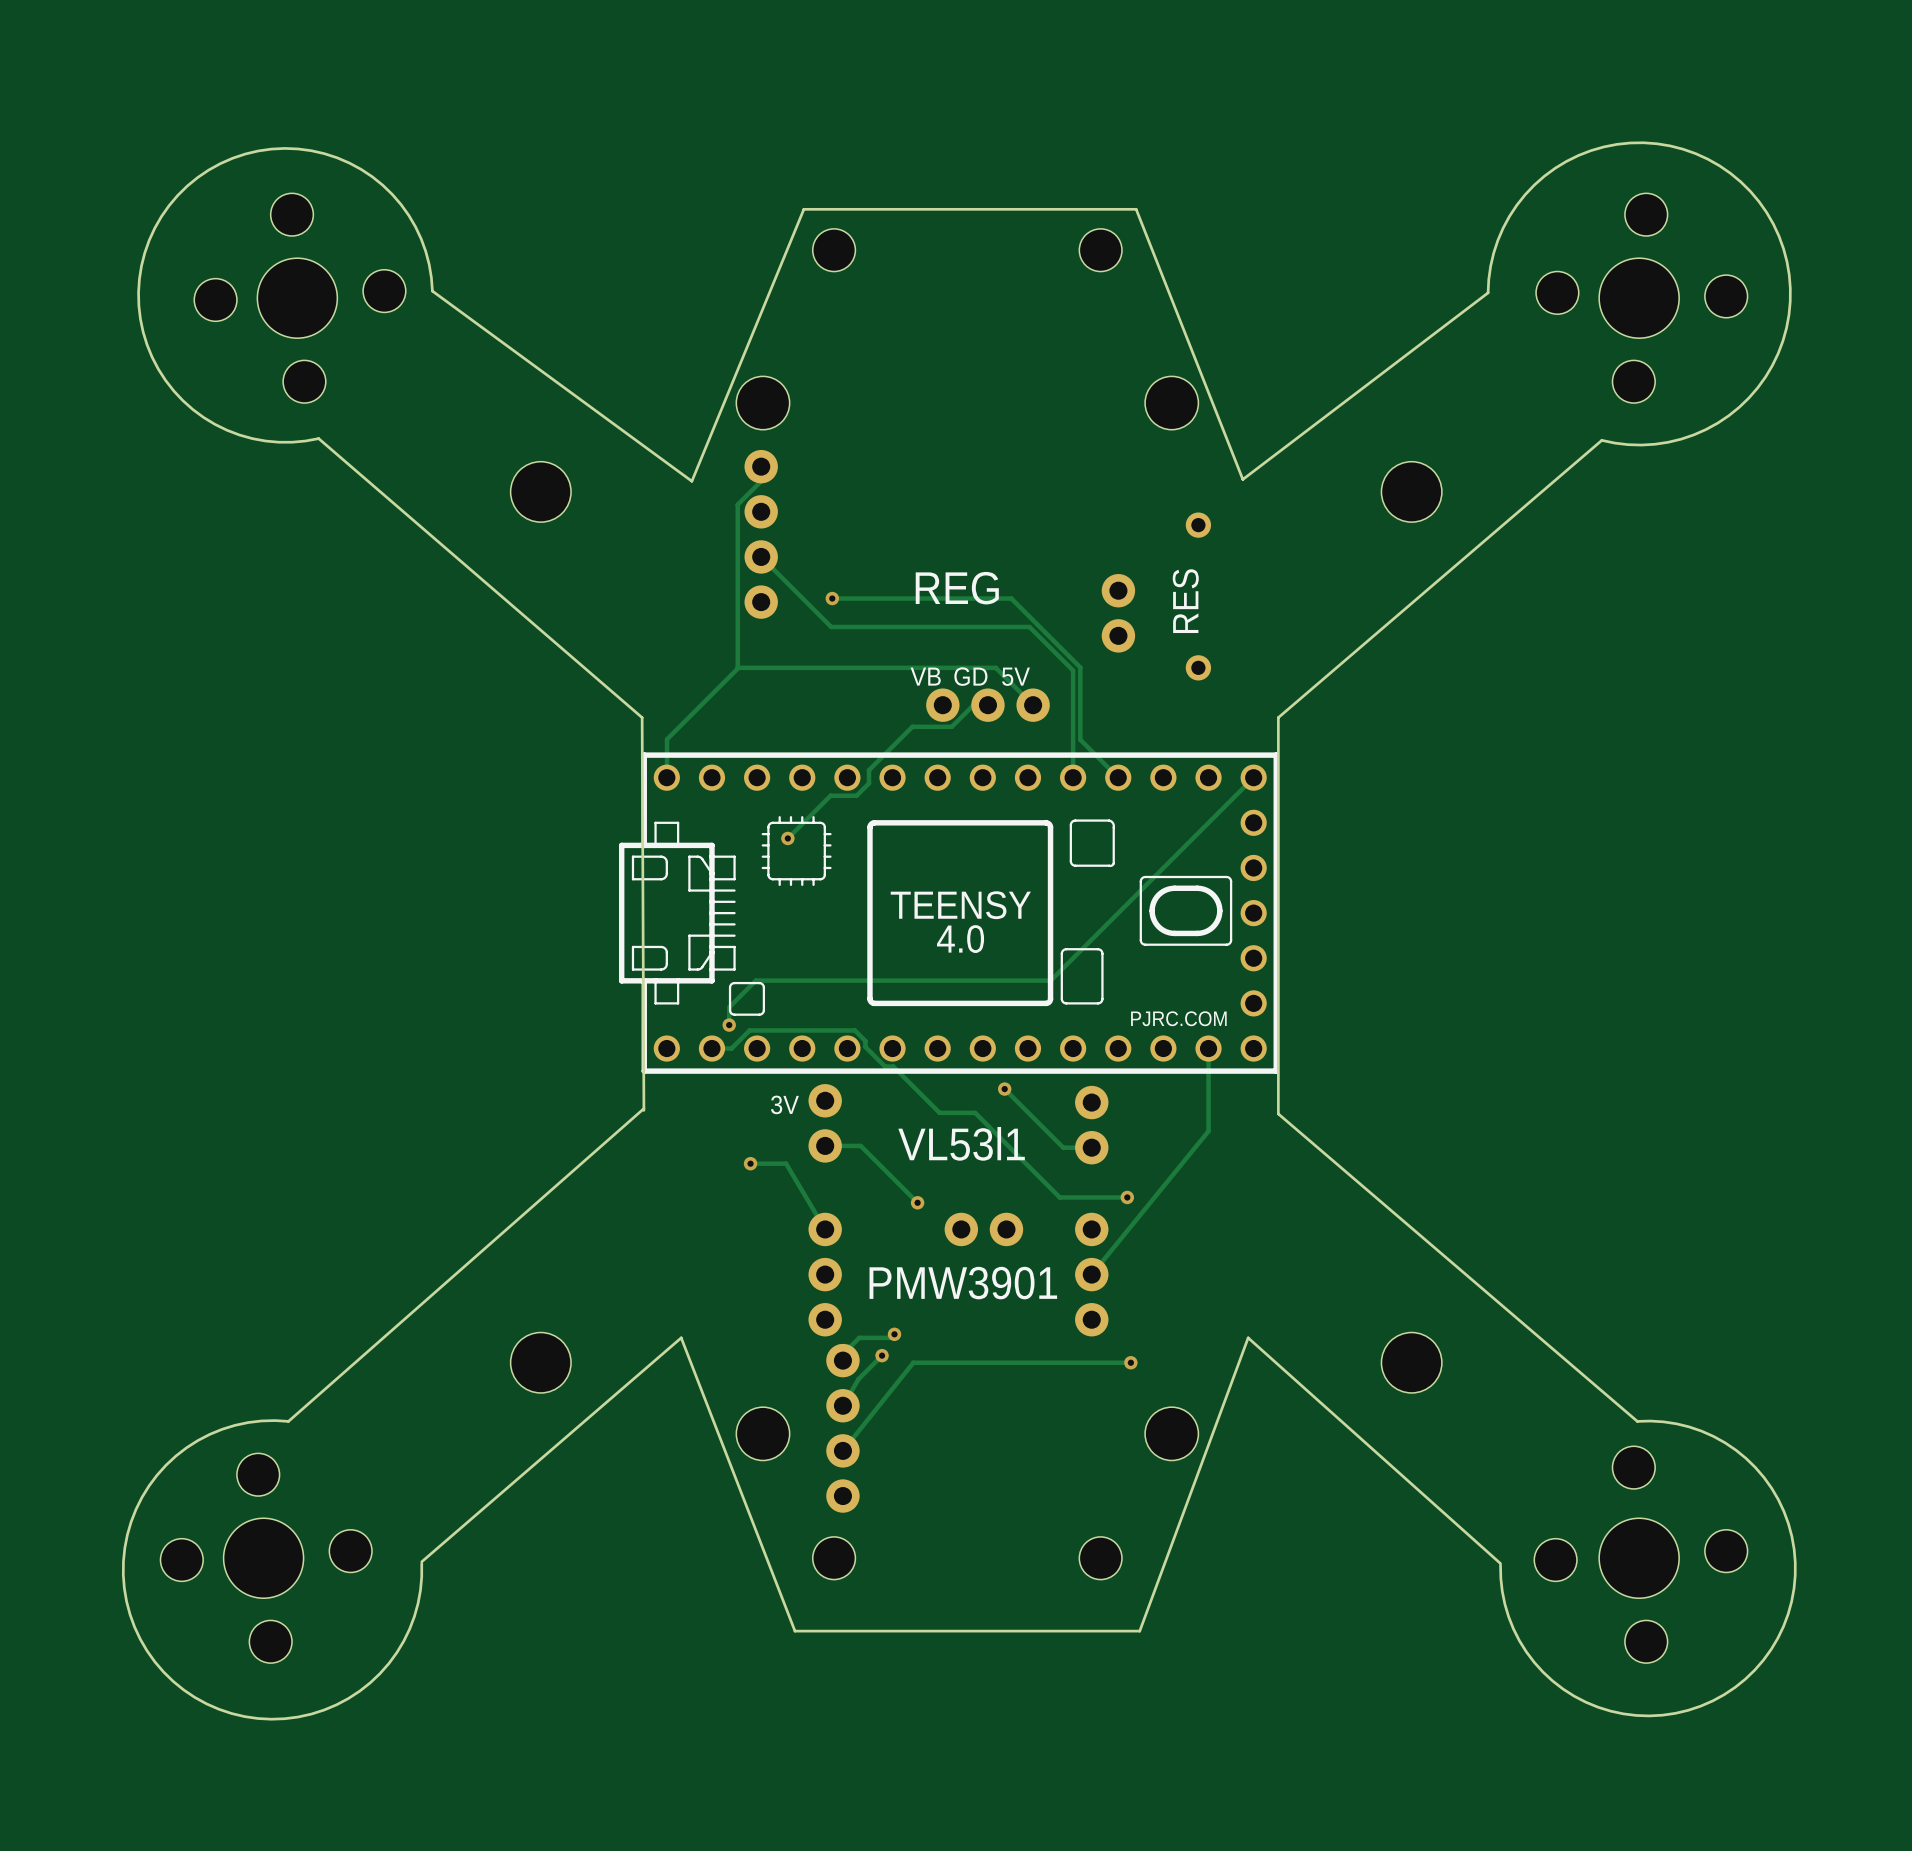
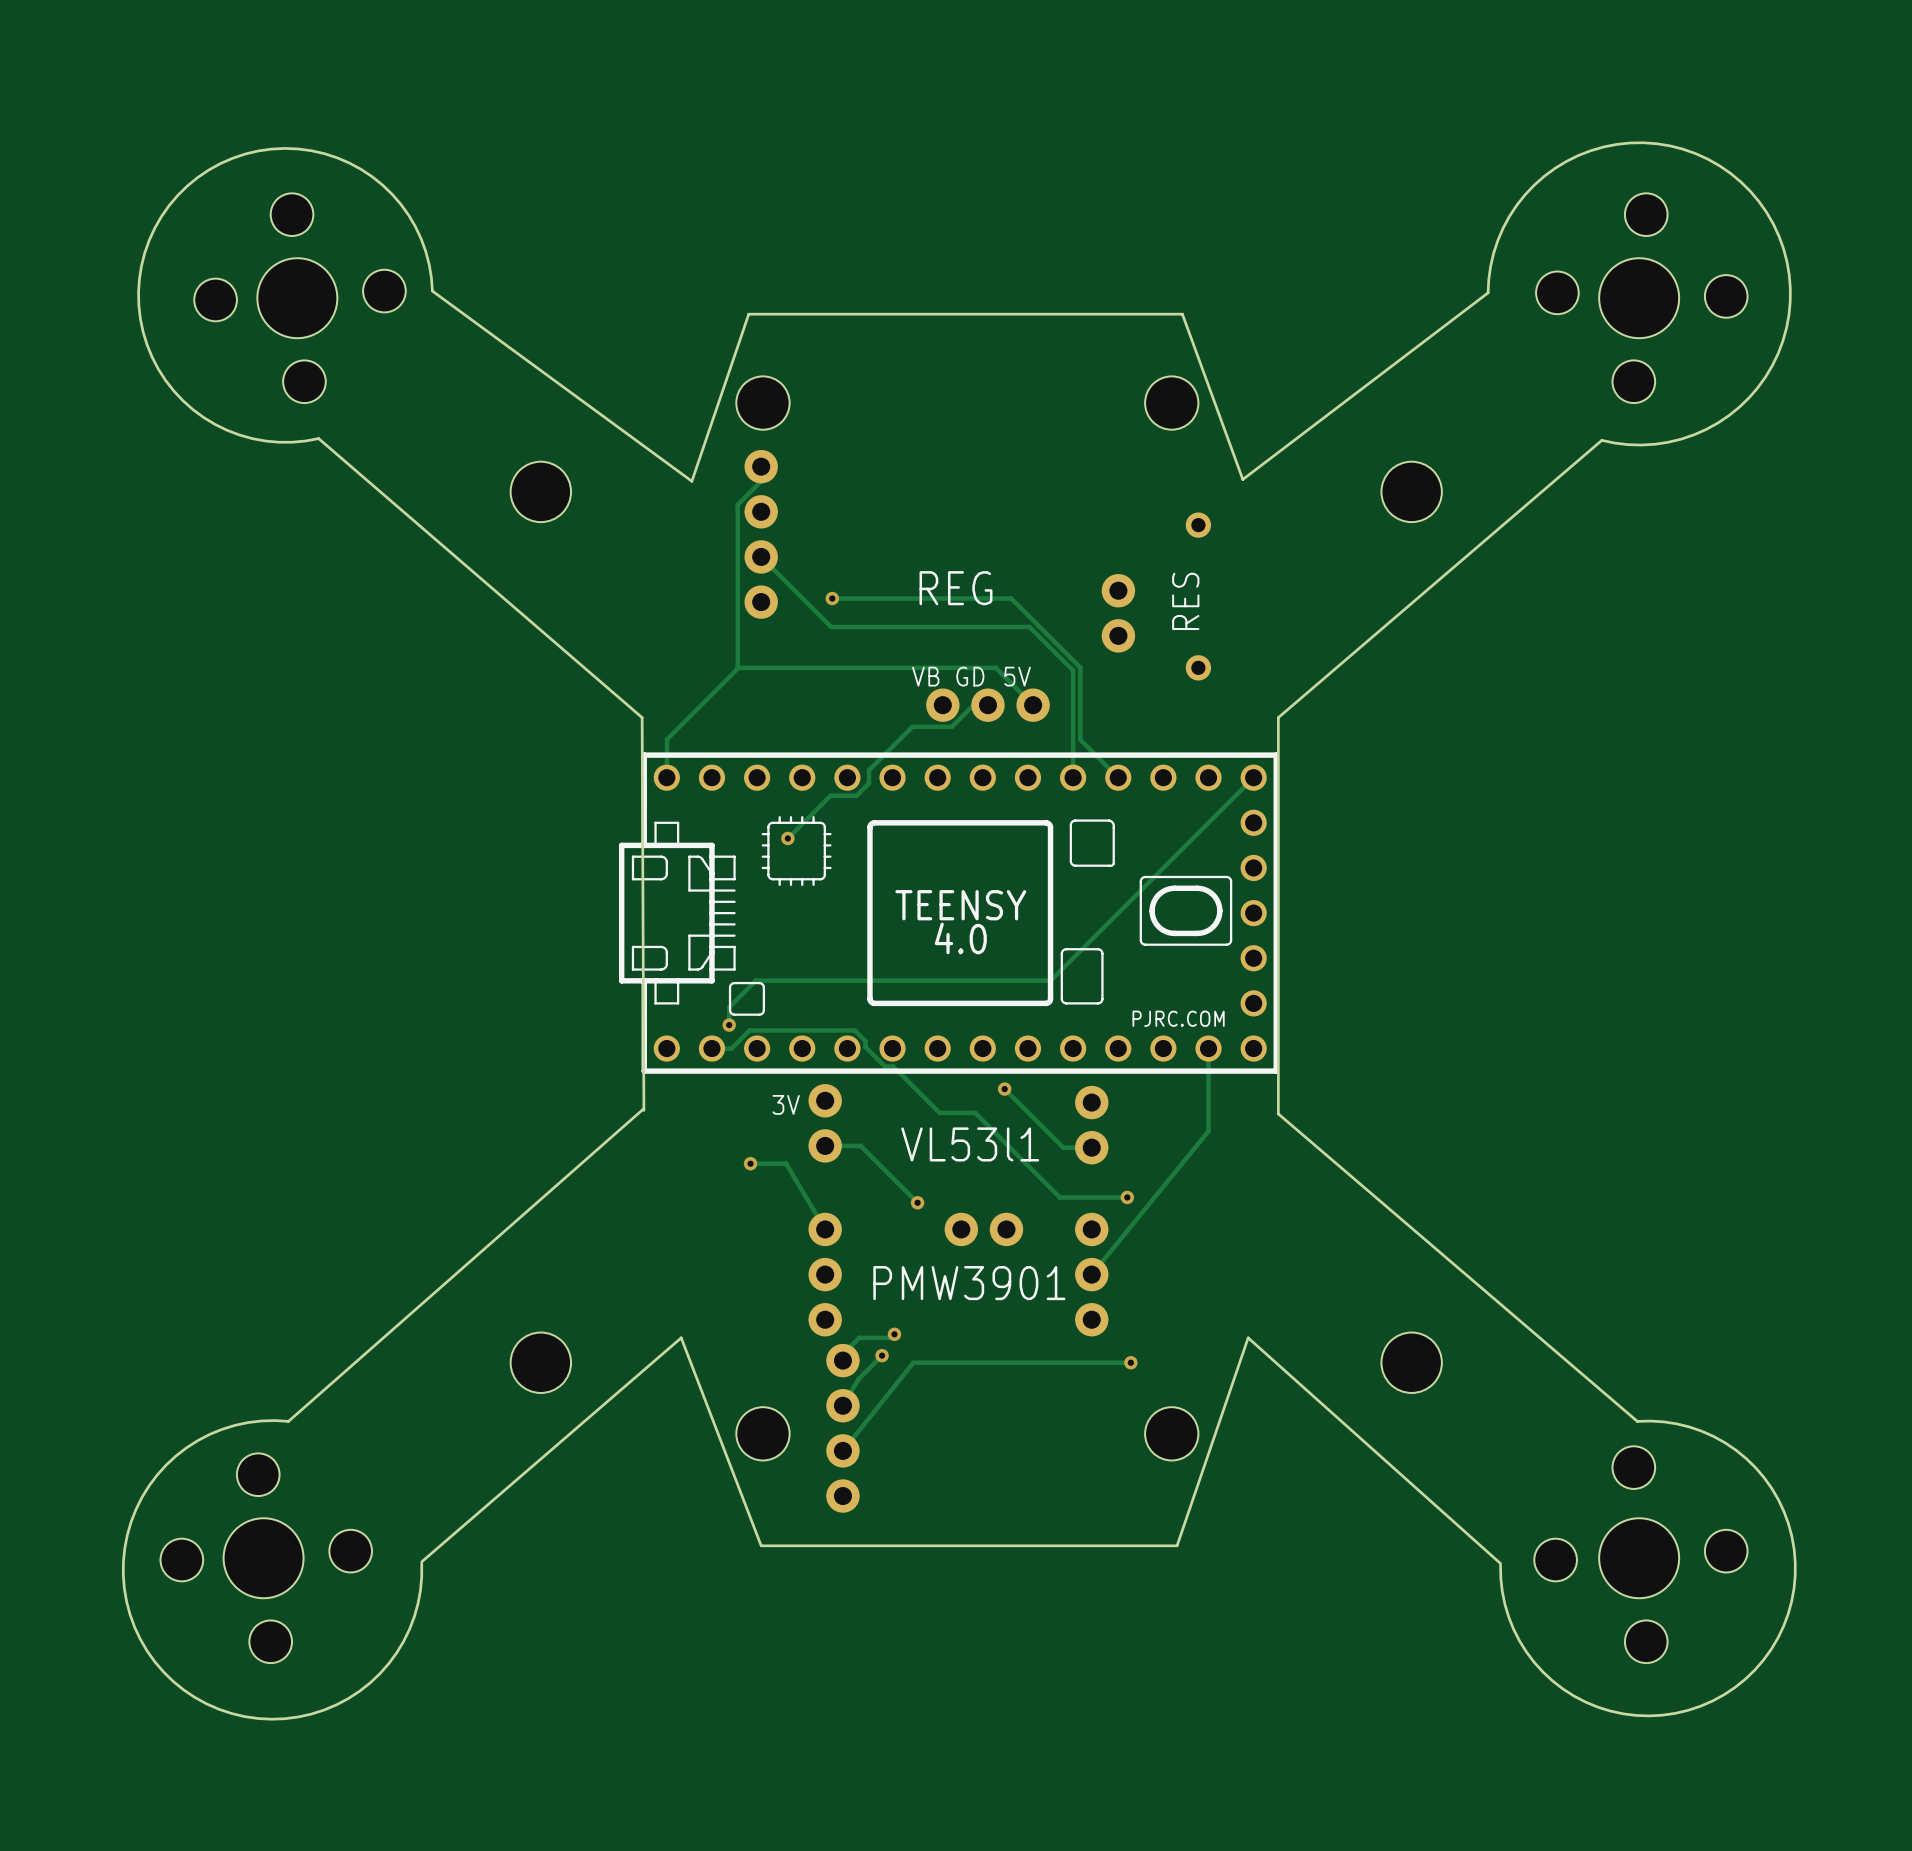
hole: (834, 250) -> none
hole: (1100, 250) -> none
board edge: (1242, 479) (1136, 209) (803, 209) (691, 481) -> (1242, 479) (1182, 314) (748, 314) (691, 481)
board edge: (1248, 1337) (1139, 1631) (794, 1631) (681, 1337) -> (1248, 1337) (1177, 1545) (761, 1545) (681, 1337)
hole: (834, 1558) -> none
hole: (1100, 1558) -> none

